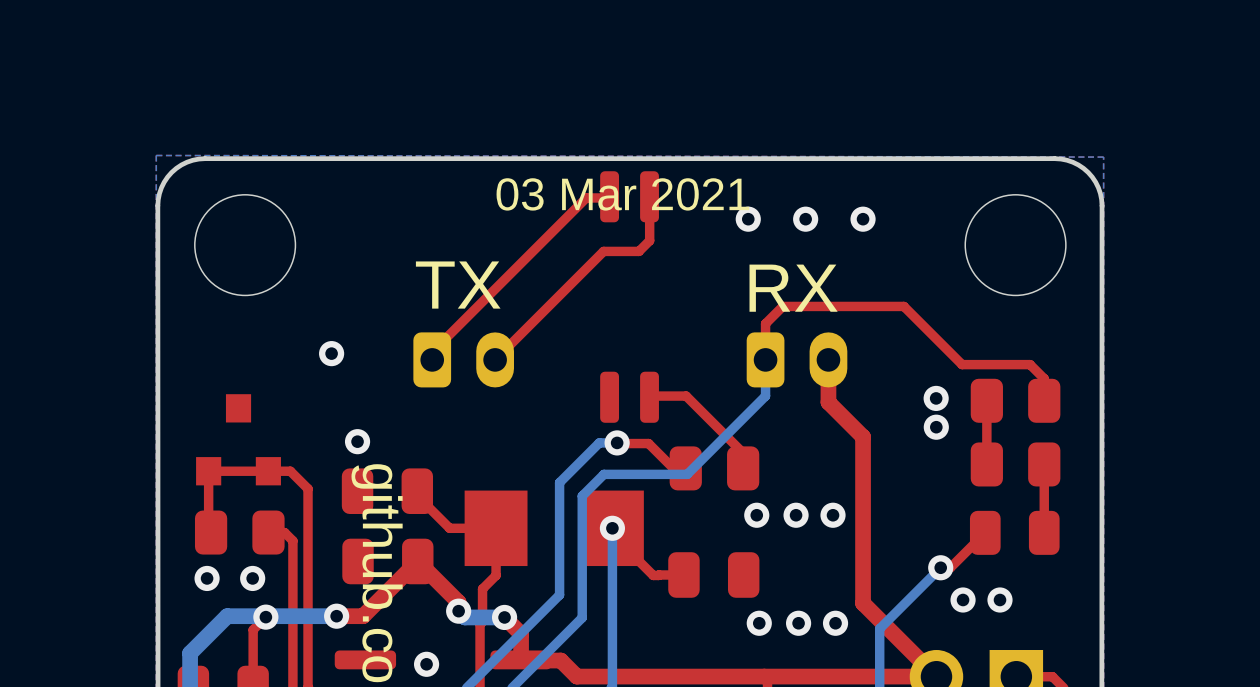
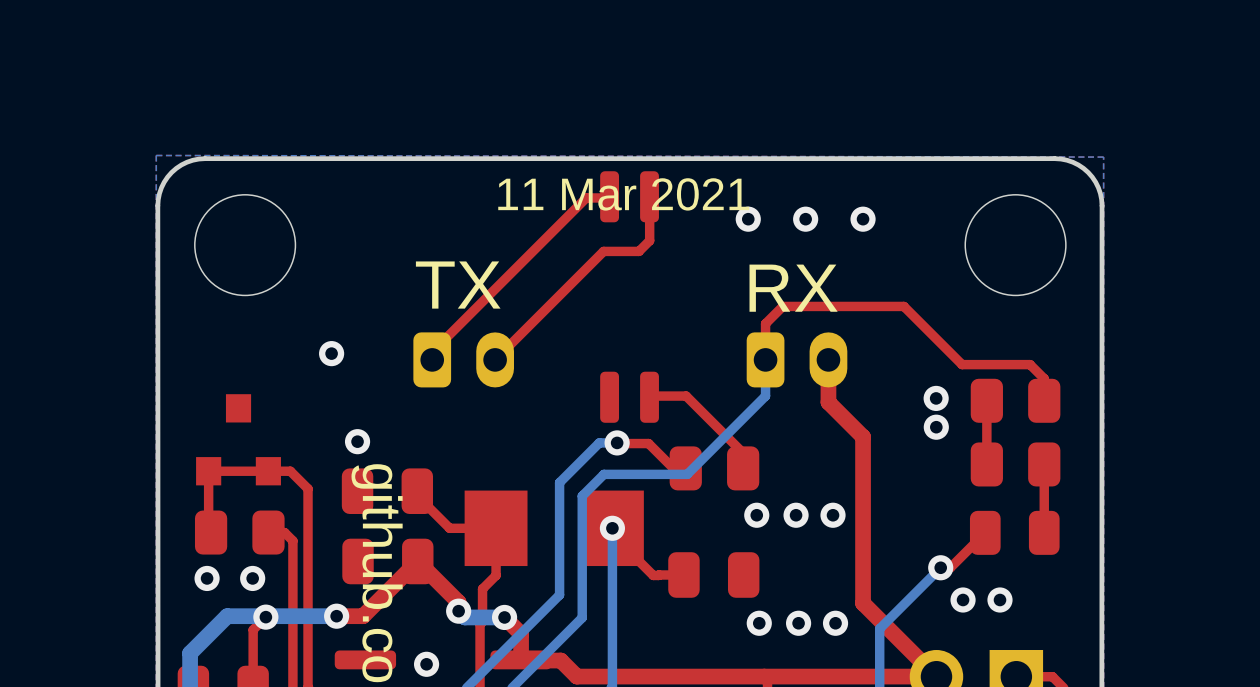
text: 03 Mar 2021 (622, 194) -> 11 Mar 2021 (623, 194)

